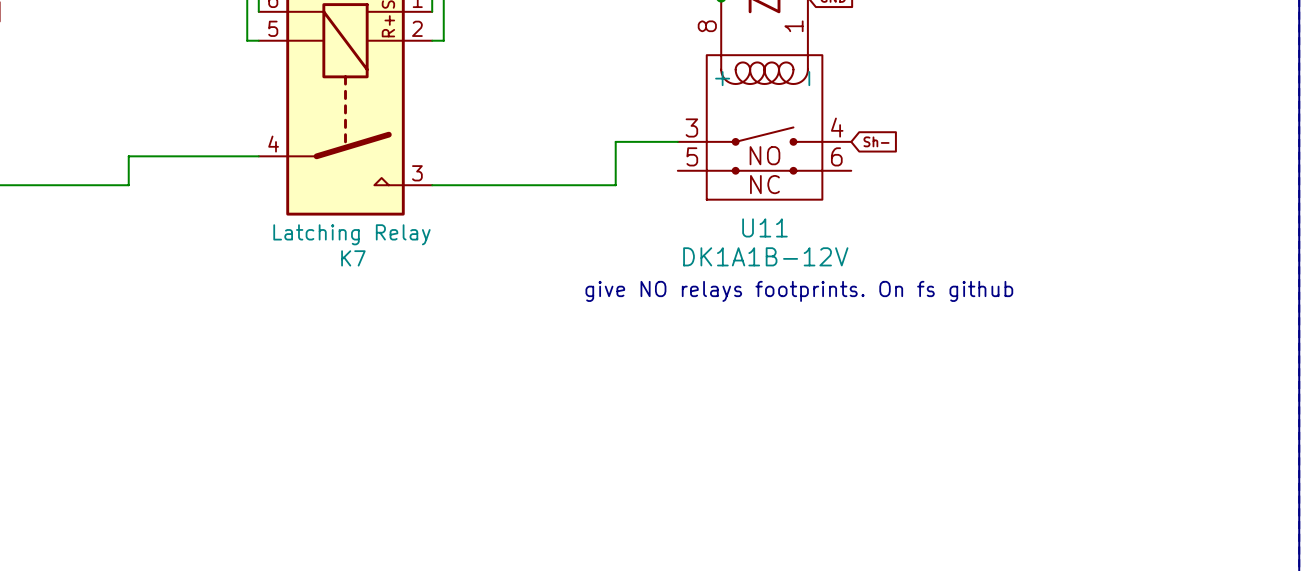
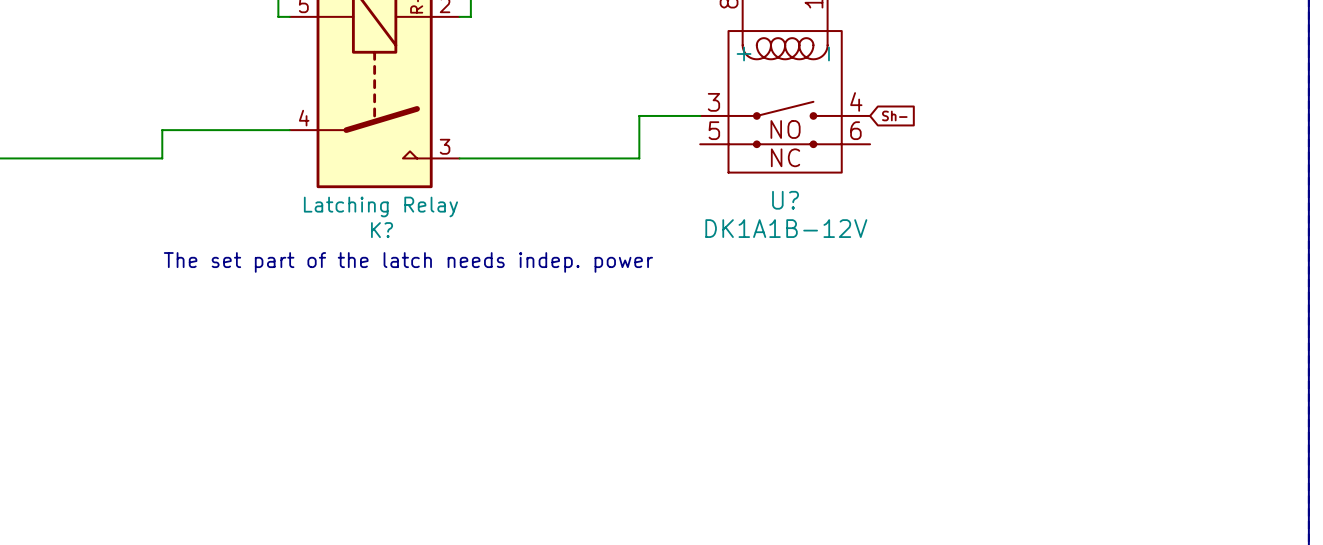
U11 name: U11 (764, 227) -> U? (785, 200)
K7 name: K7 (353, 258) -> K? (382, 230)
text: none -> The set part of the latch needs indep. power (408, 262)
text: give NO relays footprints. On fs github (799, 291) -> none

